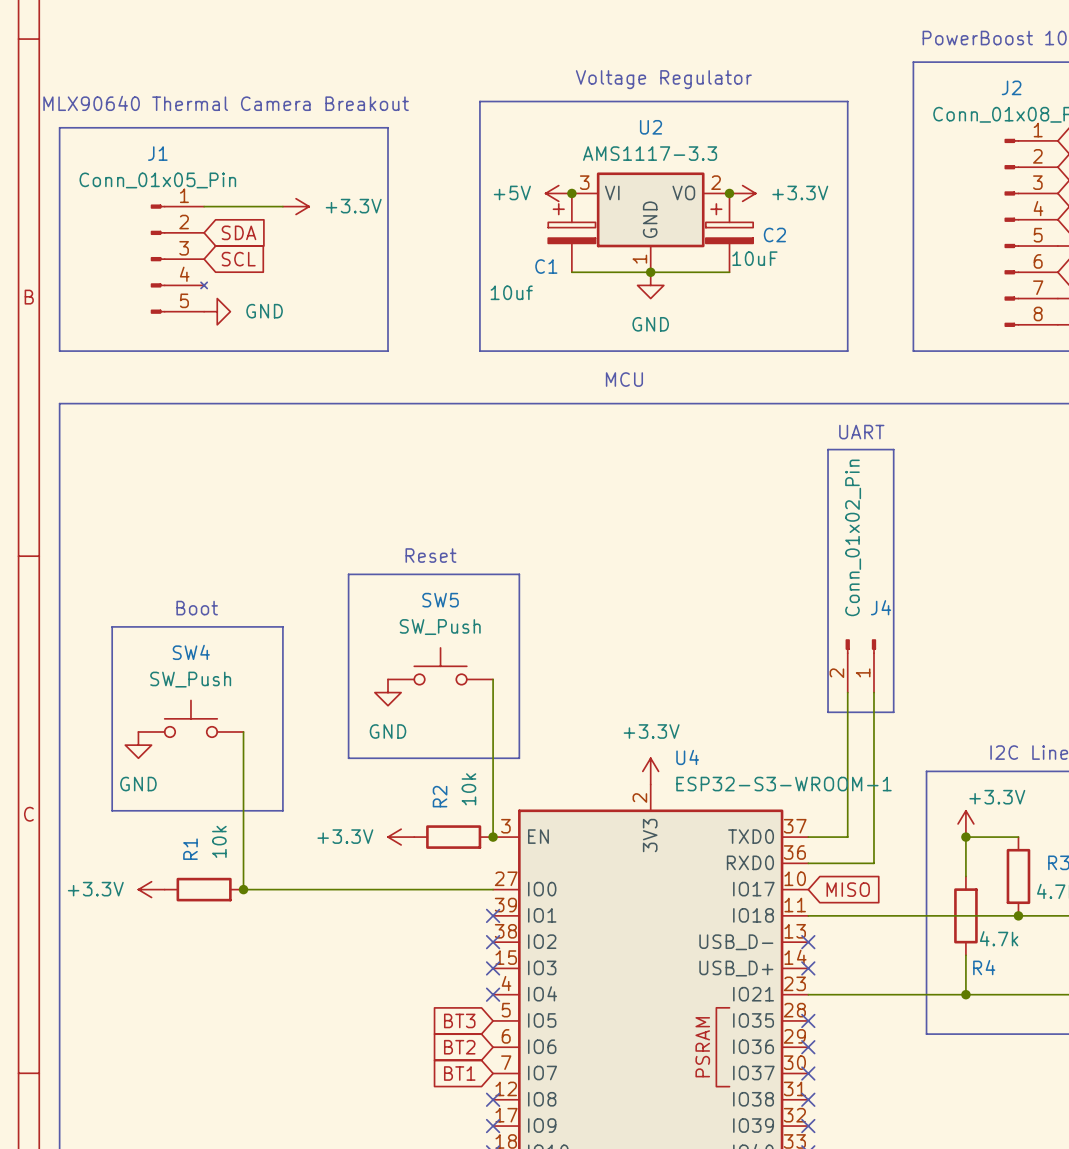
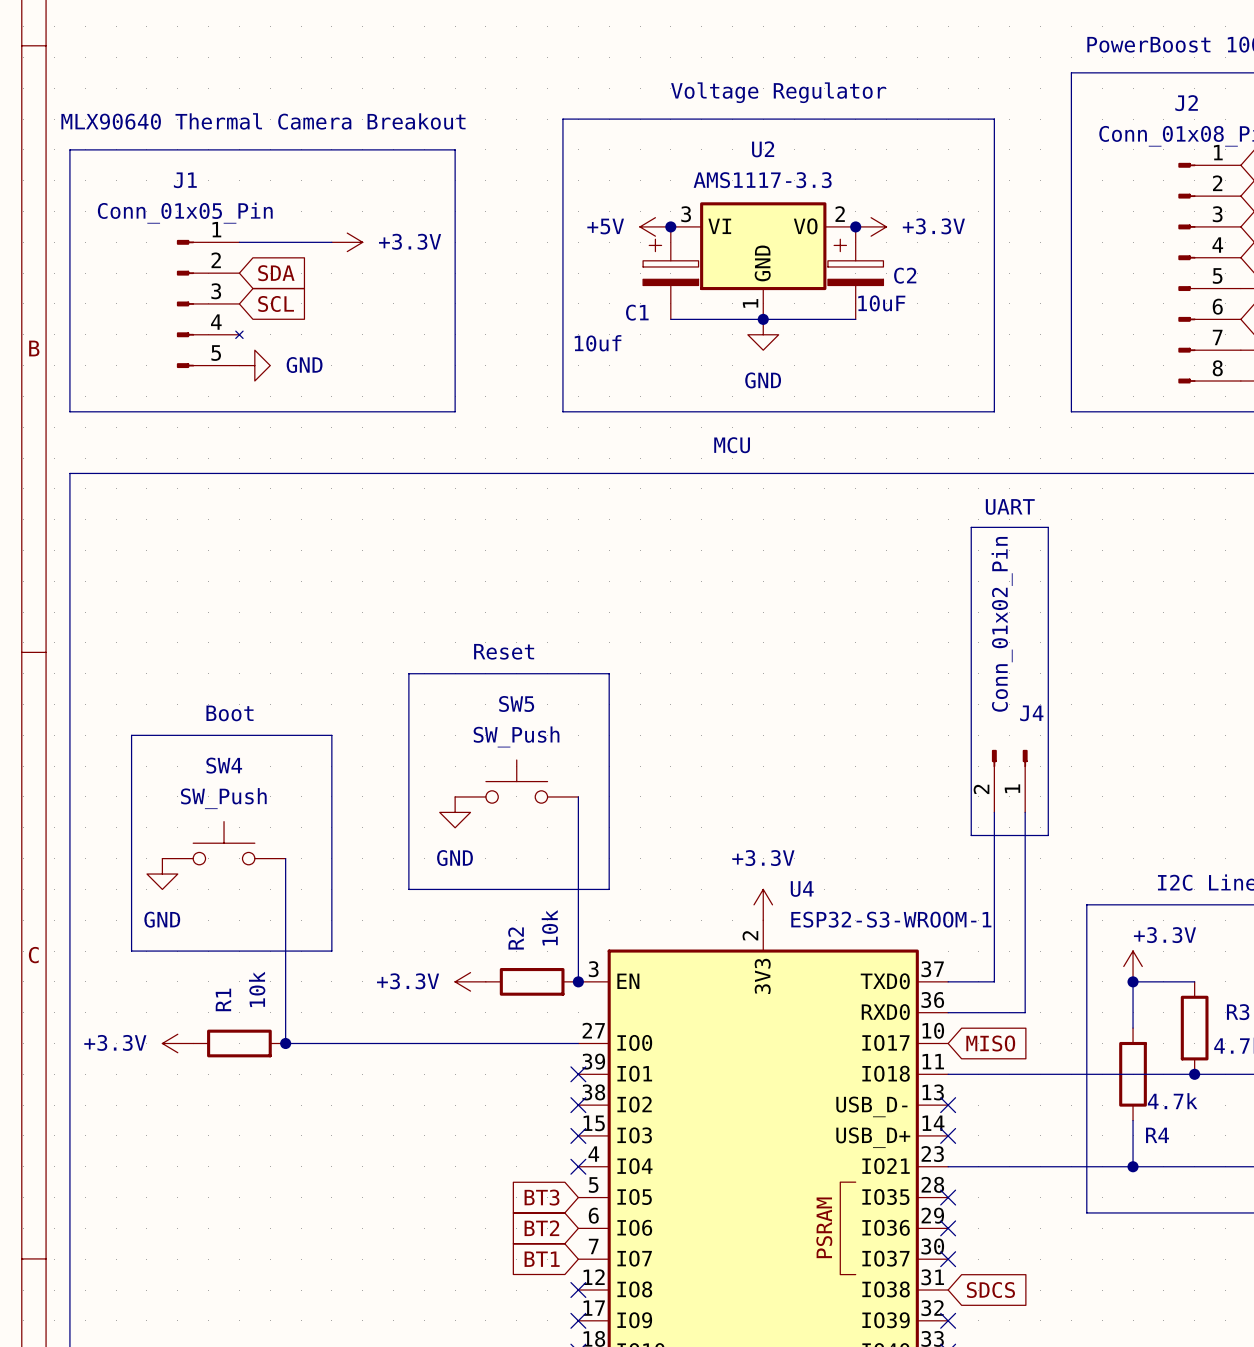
no-connect mark: (808, 1099) -> none
global label: none -> SDCS (990, 1290)

